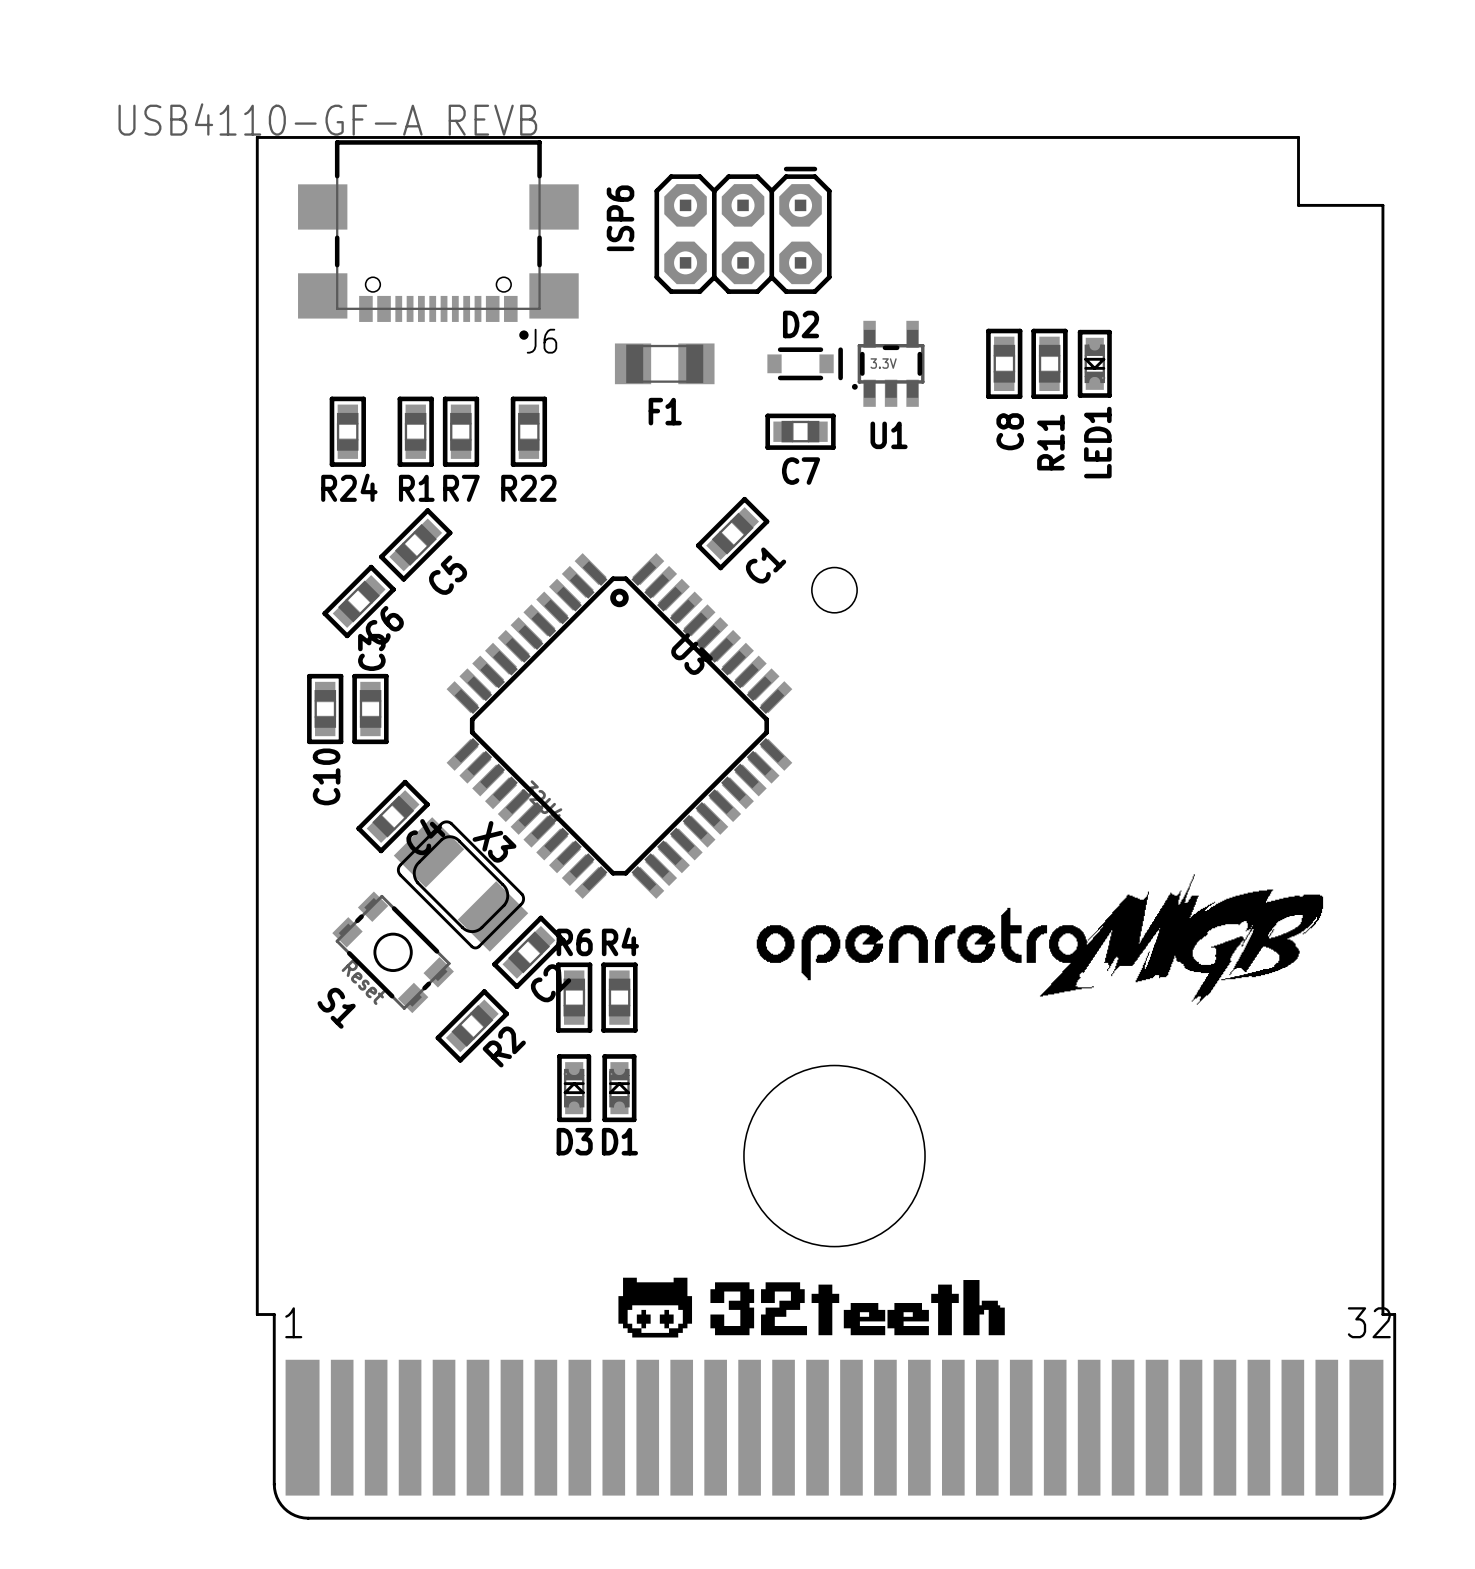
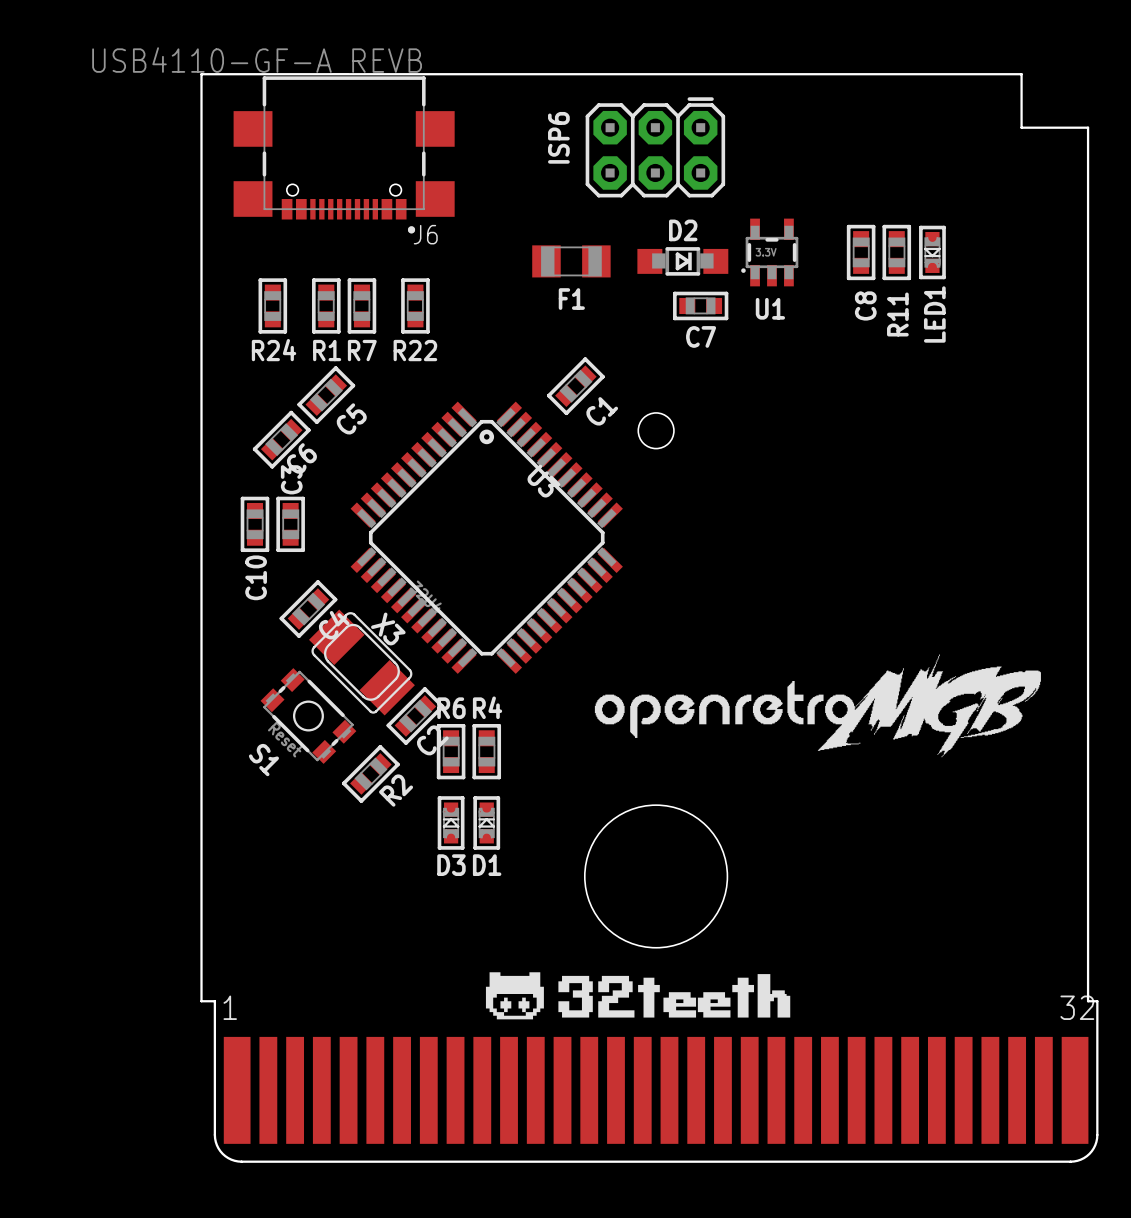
ISP6 position: (743, 230) -> (655, 147)
D2 footprint: [767, 347, 843, 381] -> [637, 247, 729, 276]
F1 position: (664, 363) -> (571, 261)
U1 position: (888, 363) -> (769, 252)
C8 position: (1004, 363) -> (861, 252)
R11 position: (1049, 363) -> (896, 252)
LED1 position: (1094, 363) -> (932, 252)
C7 position: (800, 431) -> (700, 305)

